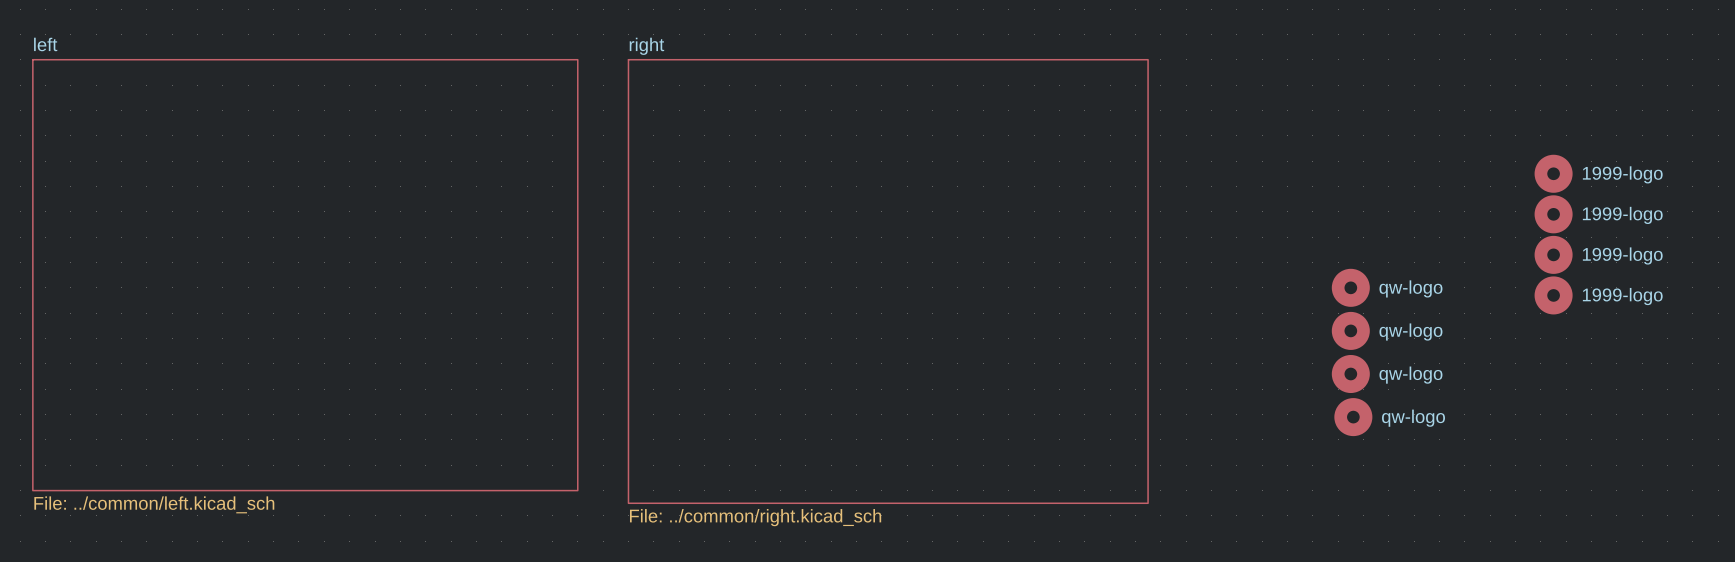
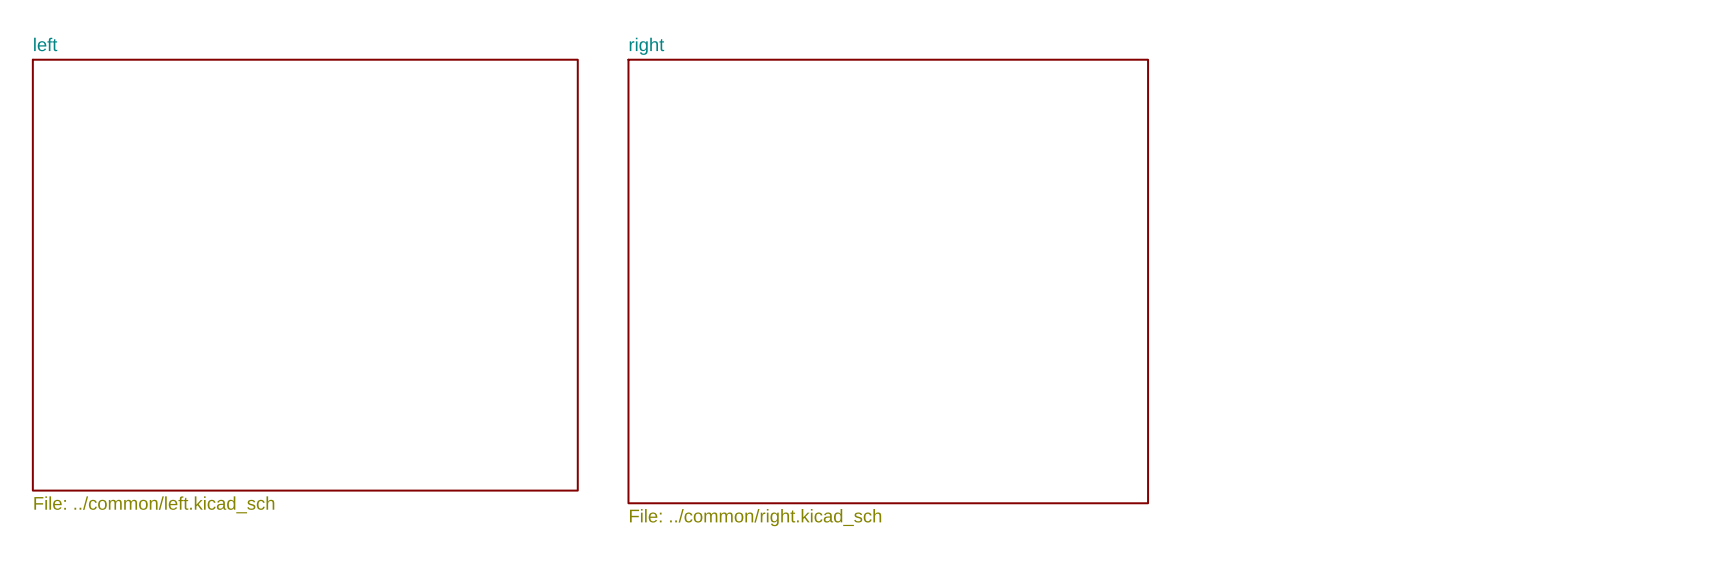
part: 1999-logo (1553, 173) -> none
part: 1999-logo (1553, 214) -> none
part: 1999-logo (1553, 254) -> none
part: qw-logo (1350, 287) -> none
part: 1999-logo (1553, 295) -> none
part: qw-logo (1350, 330) -> none
part: qw-logo (1350, 374) -> none
part: qw-logo (1353, 417) -> none

